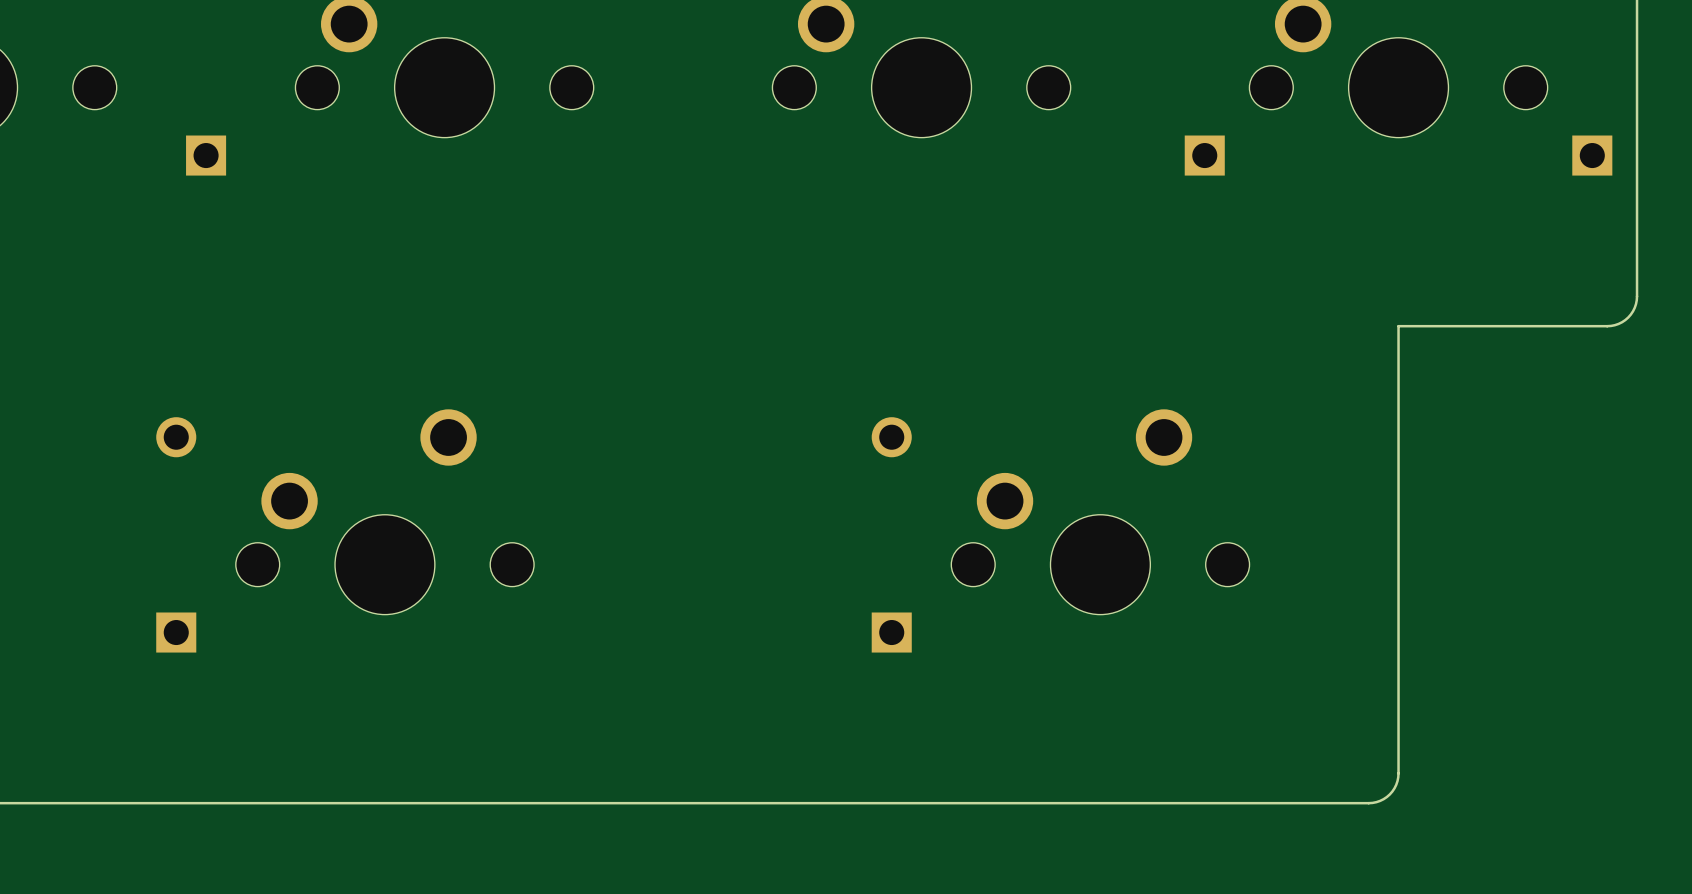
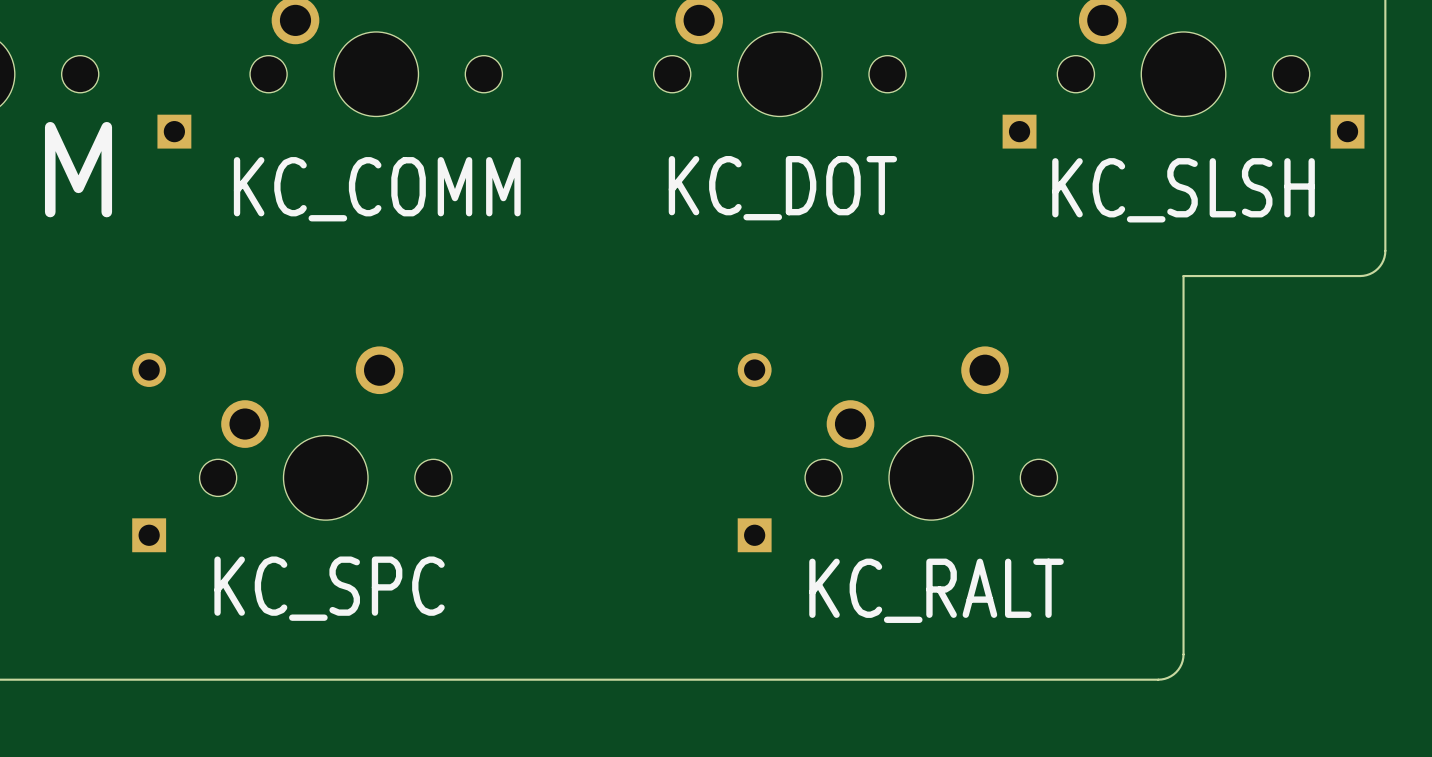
text: none -> M (78, 169)
text: none -> KC_DOT (782, 188)
text: none -> KC_COMM (377, 189)
text: none -> KC_SLSH (1183, 190)
text: none -> KC_SPC (329, 588)
text: none -> KC_RALT (936, 590)

